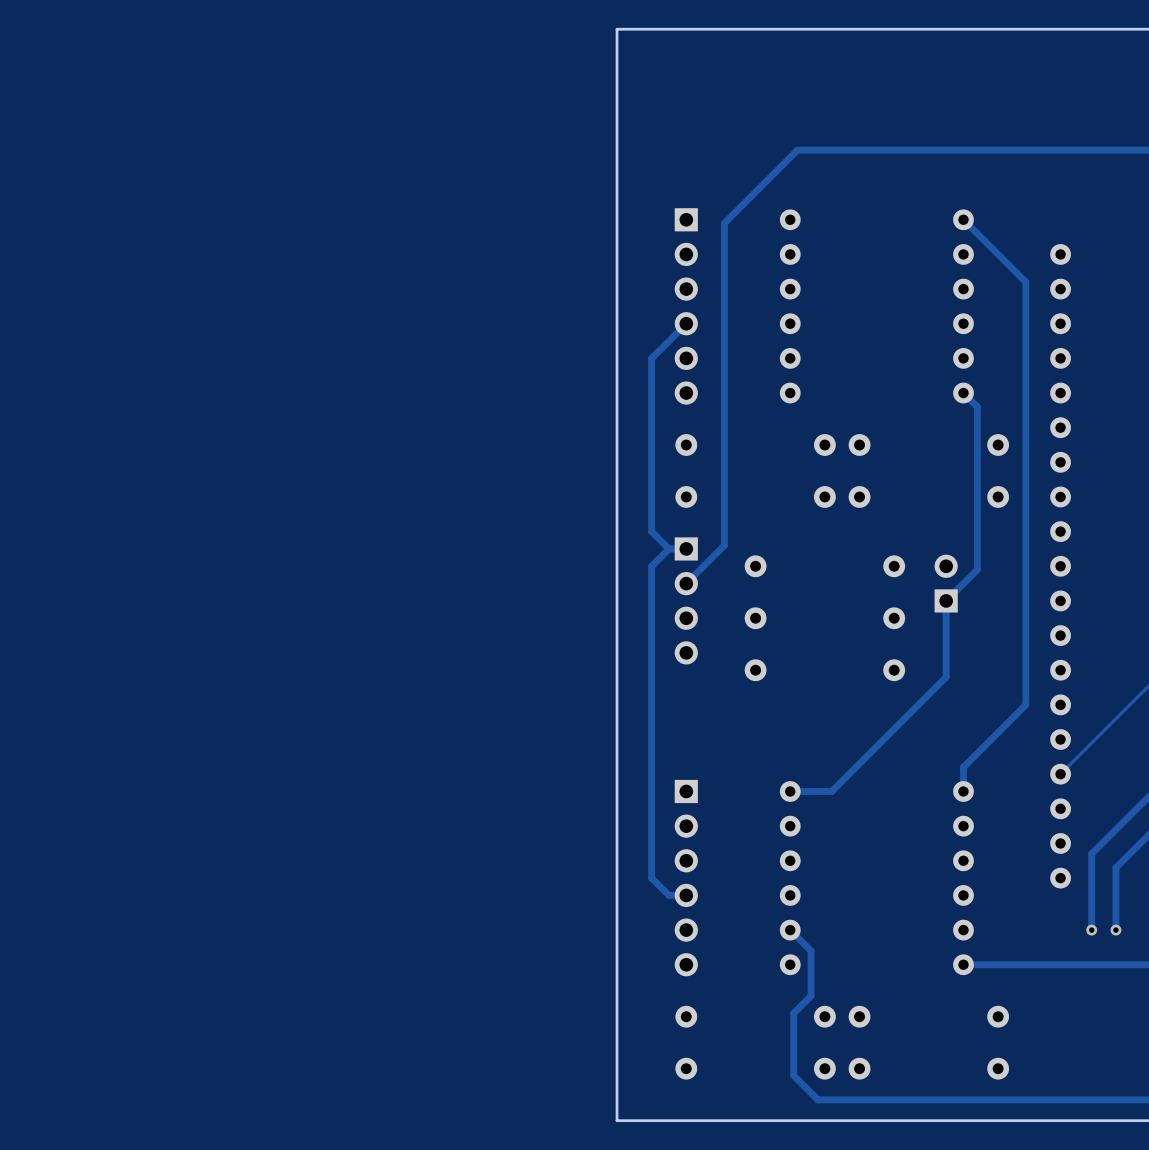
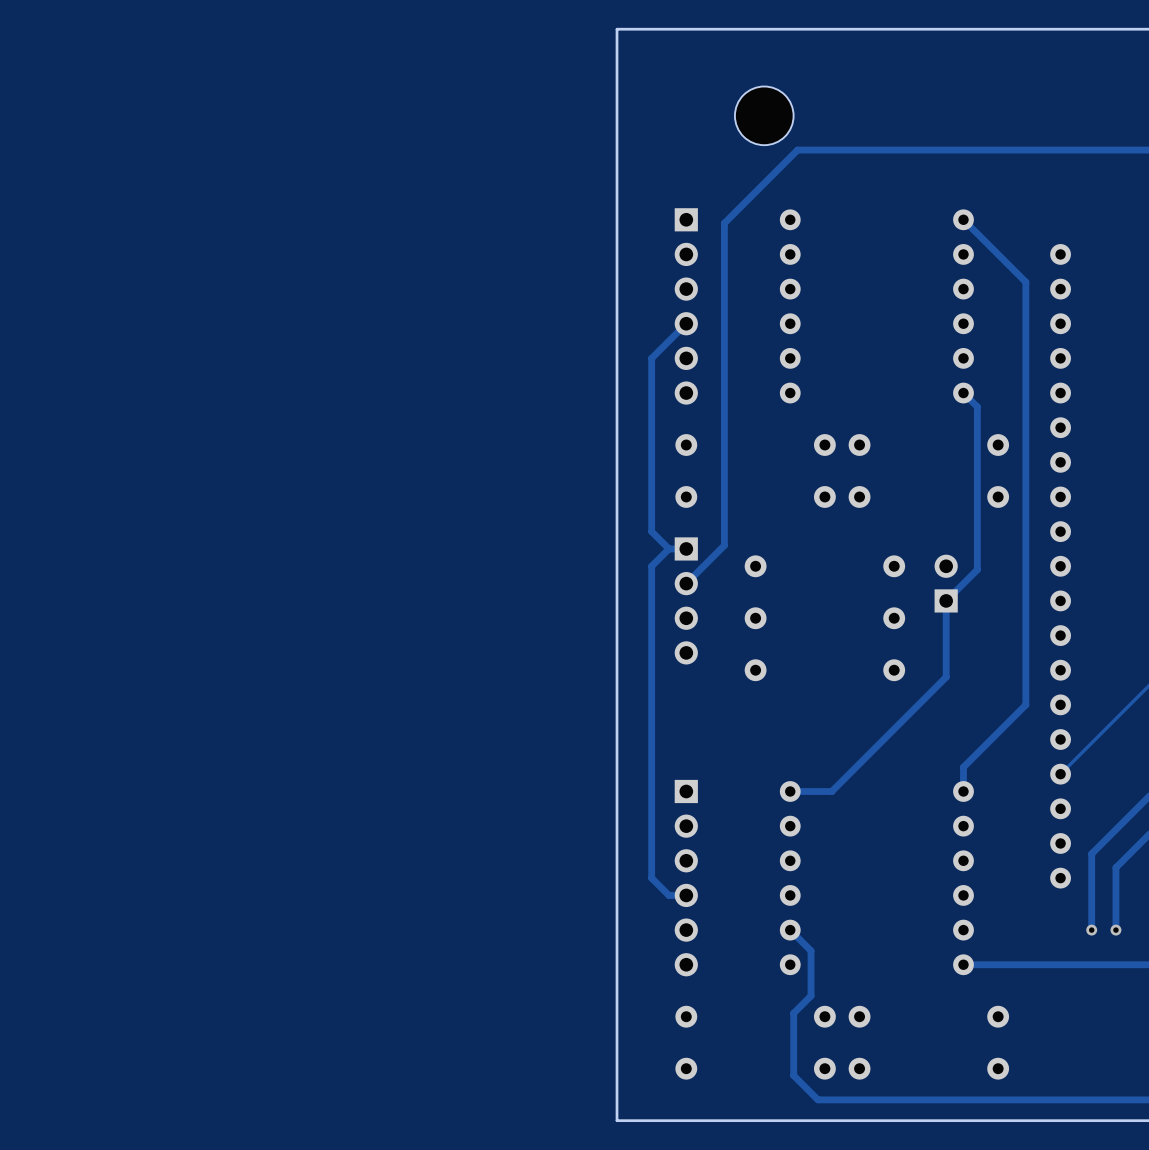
part: none -> (764, 115)

